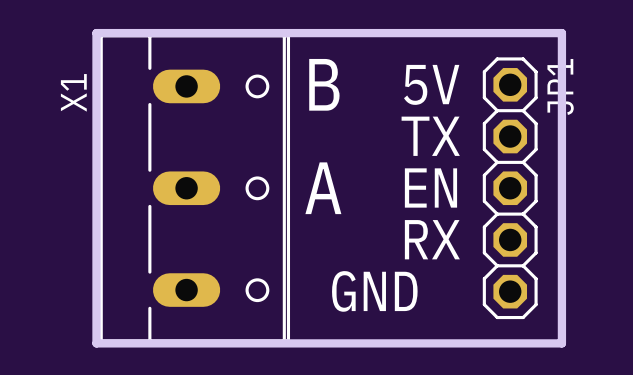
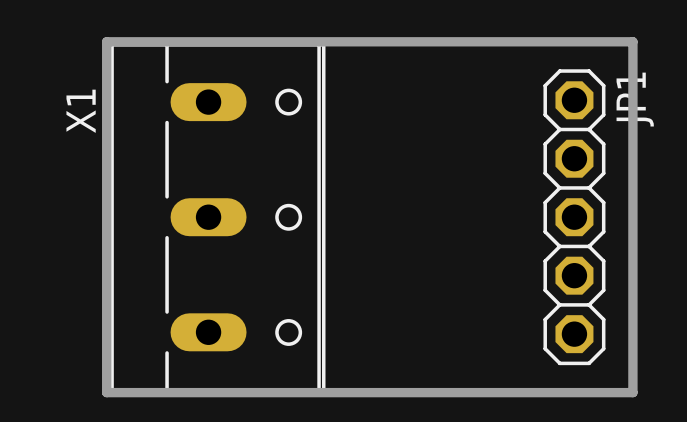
text: B (324, 84) -> none
text: 5V (431, 84) -> none
text: TX (430, 136) -> none
text: EN (430, 187) -> none
text: A (323, 188) -> none
text: RX (432, 239) -> none
text: GND (374, 291) -> none

